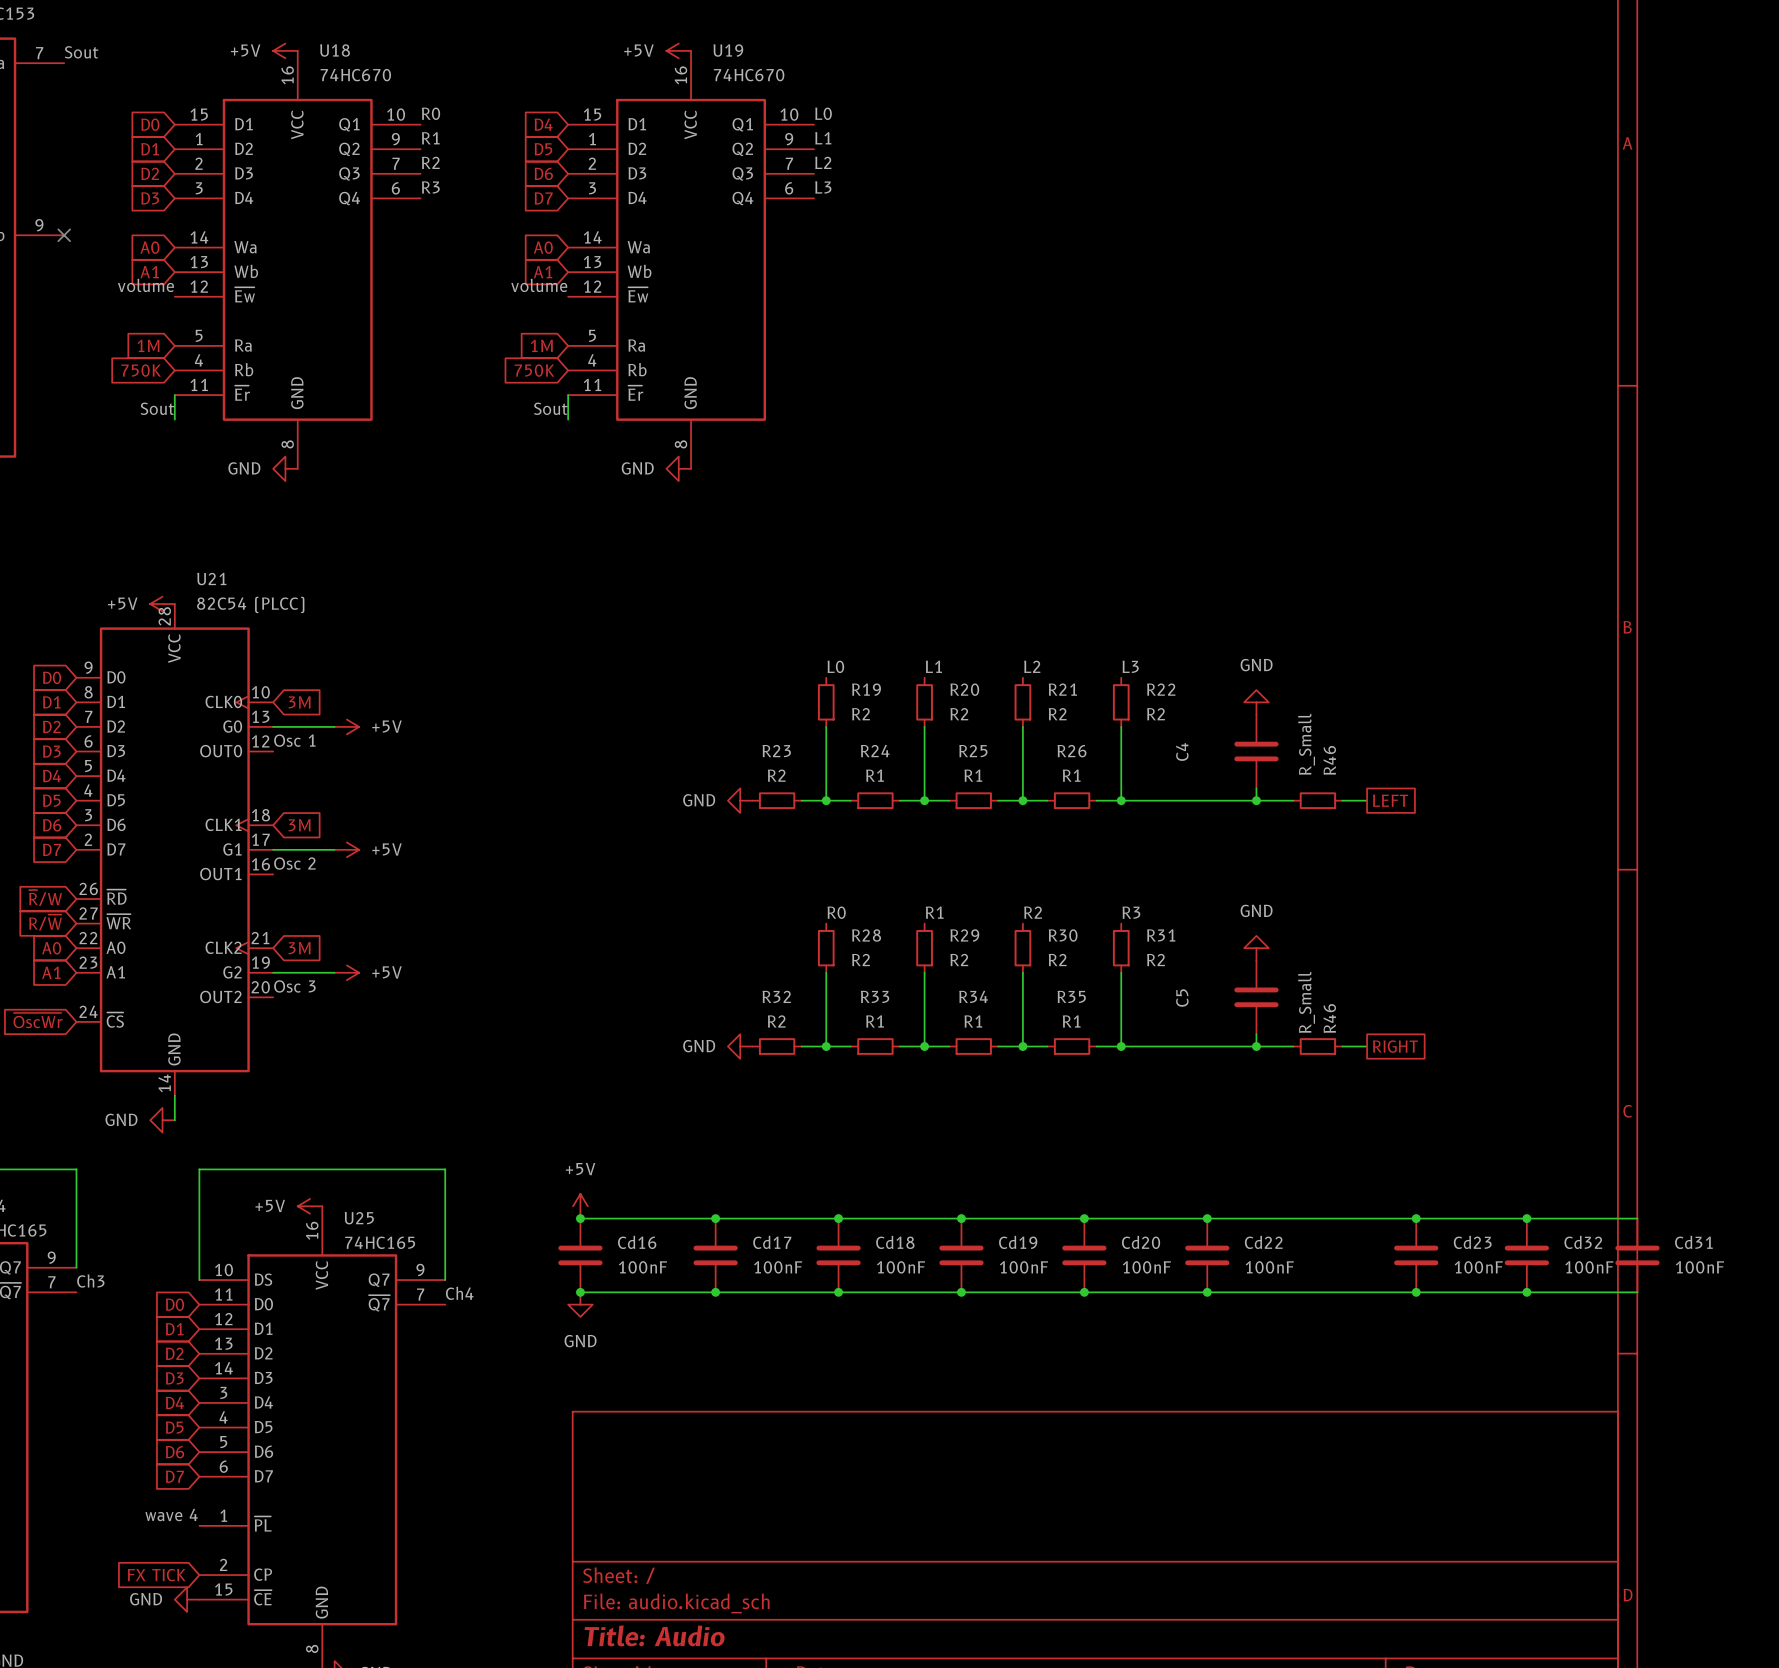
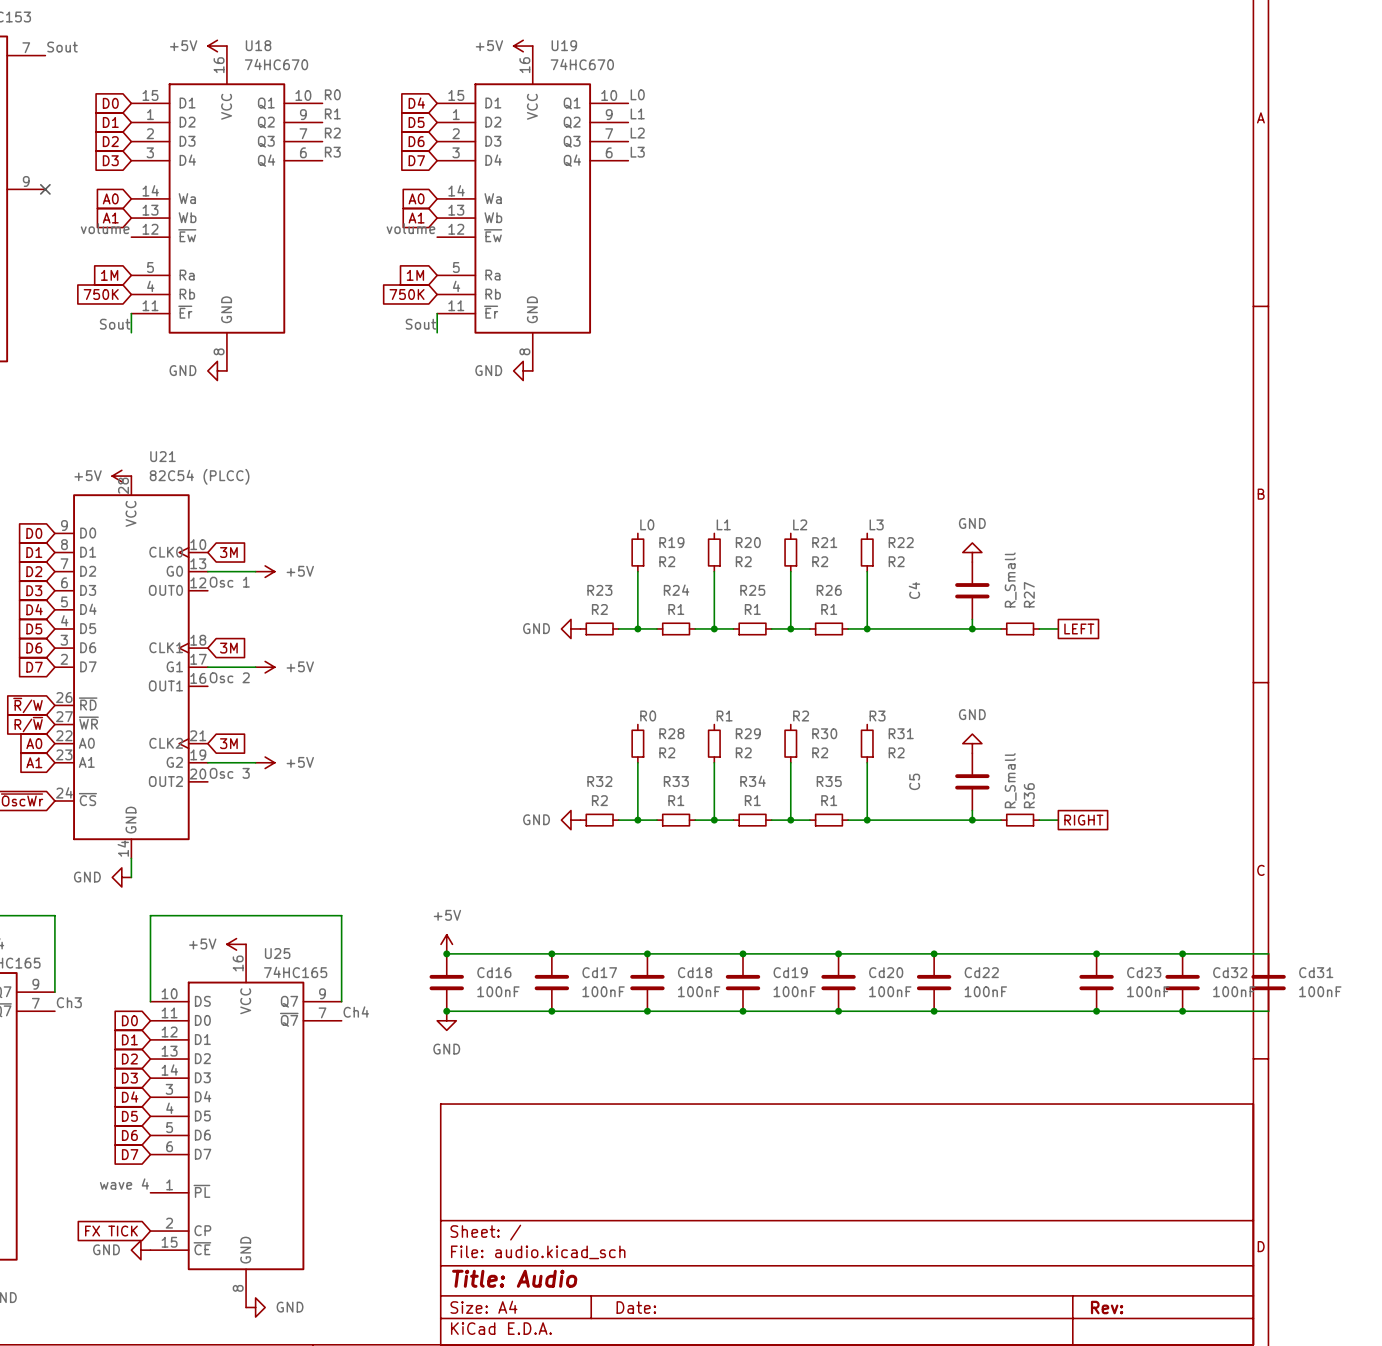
R46 name: R46 (1329, 760) -> R27 (1029, 594)
R46 name: R46 (1329, 1018) -> R36 (1029, 795)

